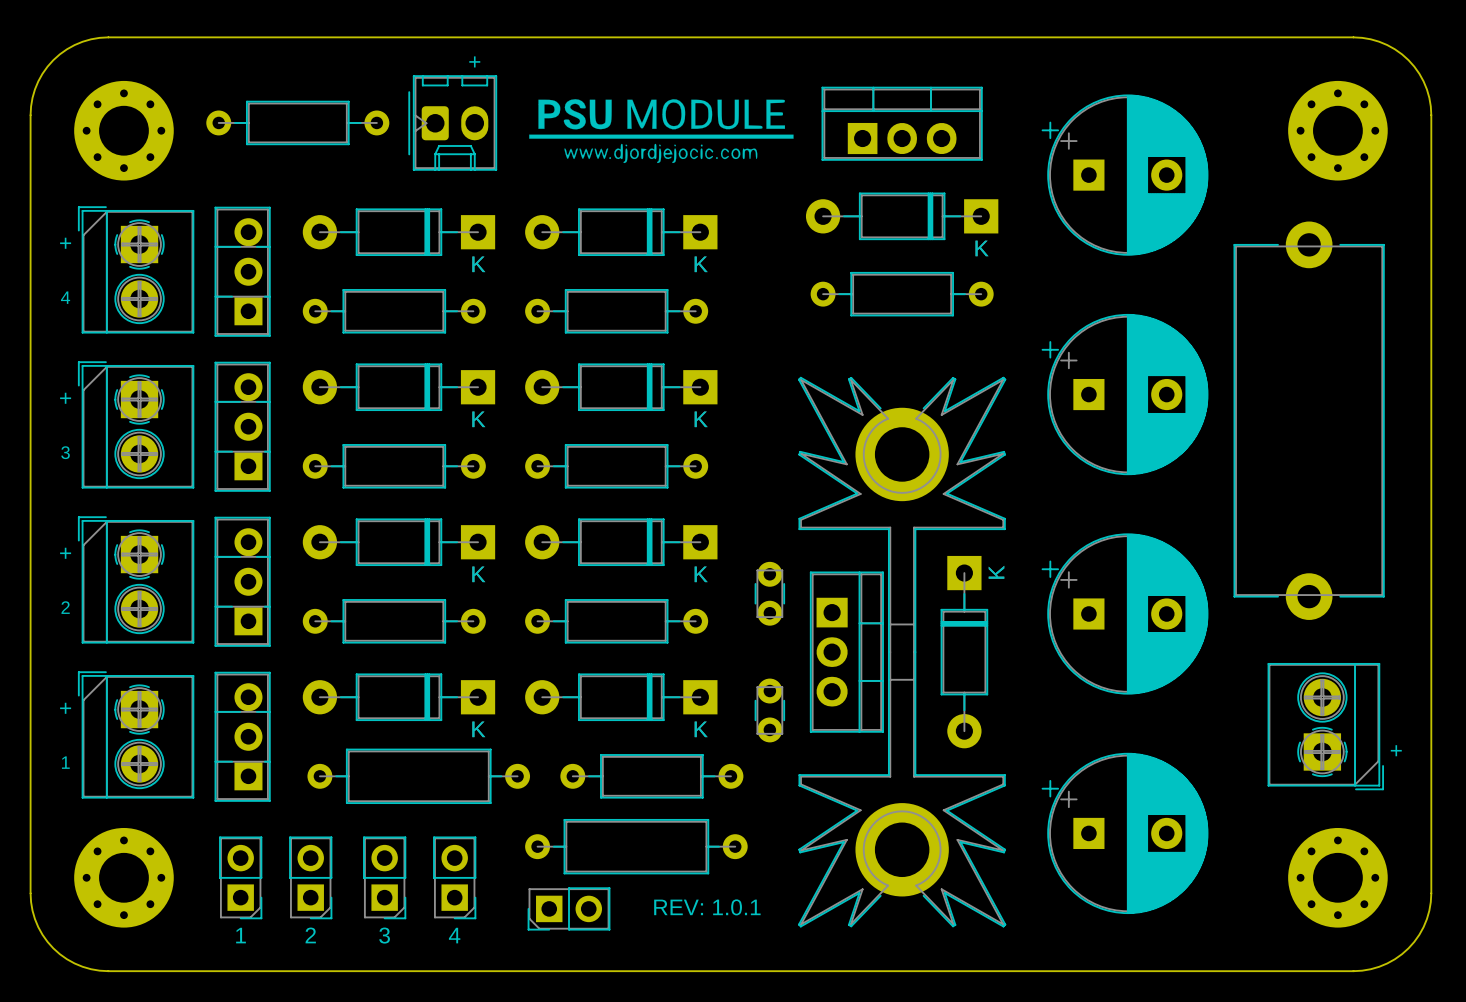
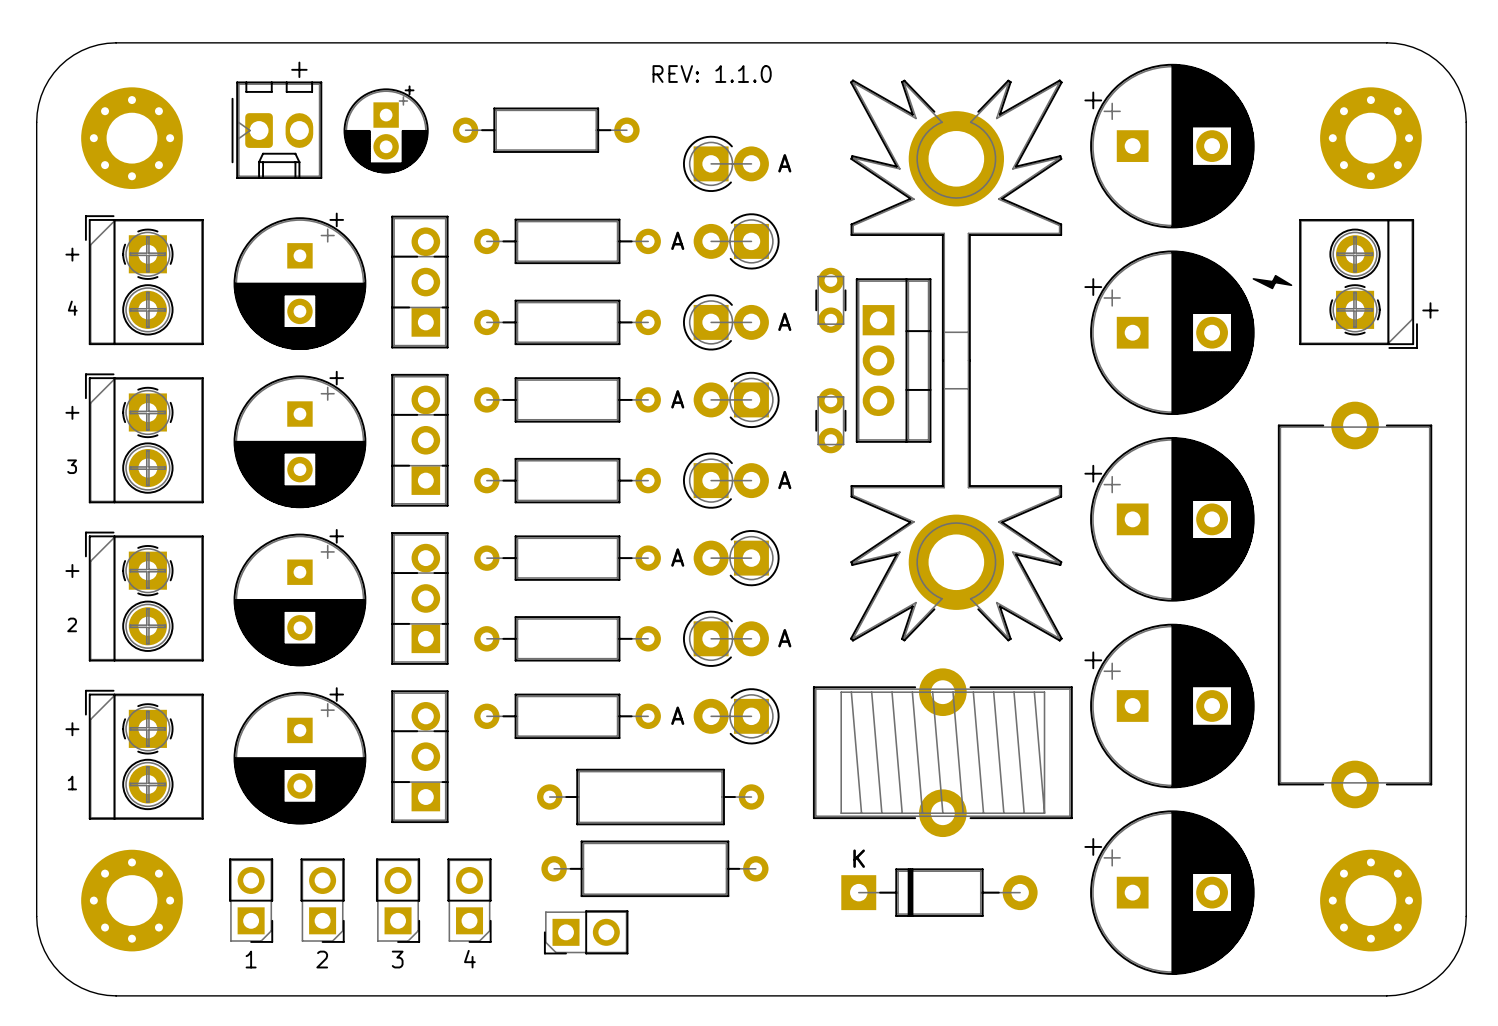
text position: + (474, 61) -> + (299, 69)
text: none -> REV: 1.1.0 (712, 74)
drawing: [529, 99, 794, 164] -> none
part: (297, 122) -> none
part: none -> (386, 129)
part position: (452, 122) -> (276, 130)
part: none -> (546, 130)
part: (902, 123) -> none
part: none -> (725, 163)
part position: (1125, 175) -> (1169, 146)
part: (902, 216) -> none
part: none -> (567, 241)
part: none -> (736, 241)
part: (398, 232) -> none
part: (621, 232) -> none
drawing: none -> [1252, 274, 1293, 290]
part: (242, 271) -> none
part: none -> (299, 281)
part: none -> (419, 282)
part: none -> (1358, 283)
part: none -> (830, 300)
part: (902, 294) -> none
text: none -> + (1430, 310)
part: (394, 311) -> none
part: none -> (567, 322)
part: (616, 311) -> none
part: none -> (725, 322)
part: none -> (1169, 332)
part: none -> (893, 360)
part: (398, 387) -> none
part: none -> (567, 399)
part: (621, 387) -> none
part: none -> (736, 399)
part: (1125, 394) -> none
part: none -> (830, 420)
part position: (1309, 420) -> (1355, 604)
part: (242, 426) -> none
part: none -> (299, 439)
part: none -> (419, 440)
part: (394, 466) -> none
part: none -> (567, 480)
part: (616, 466) -> none
part: none -> (725, 480)
part: none -> (1169, 519)
part: (398, 542) -> none
part: none -> (567, 558)
part: (621, 542) -> none
part: none -> (736, 558)
part: (242, 581) -> none
part: none -> (299, 597)
part: none -> (419, 598)
part: (769, 593) -> none
part: (1125, 613) -> none
part: (394, 621) -> none
part: none -> (567, 638)
part: (616, 621) -> none
part: none -> (725, 638)
part: (846, 652) -> none
part position: (902, 652) -> (956, 360)
part: (964, 652) -> none
part: none -> (1169, 706)
part: (398, 697) -> none
part: none -> (567, 716)
part: (621, 697) -> none
part: none -> (736, 716)
part: (769, 710) -> none
part: (1325, 726) -> none
part: none -> (942, 752)
part: (242, 736) -> none
part: none -> (299, 755)
part: none -> (419, 756)
text: + (1396, 750) -> none
part position: (418, 776) -> (650, 797)
part: (651, 776) -> none
part position: (1125, 833) -> (1169, 892)
part: none -> (939, 892)
text: REV: 1.0.1 (707, 907) -> none

